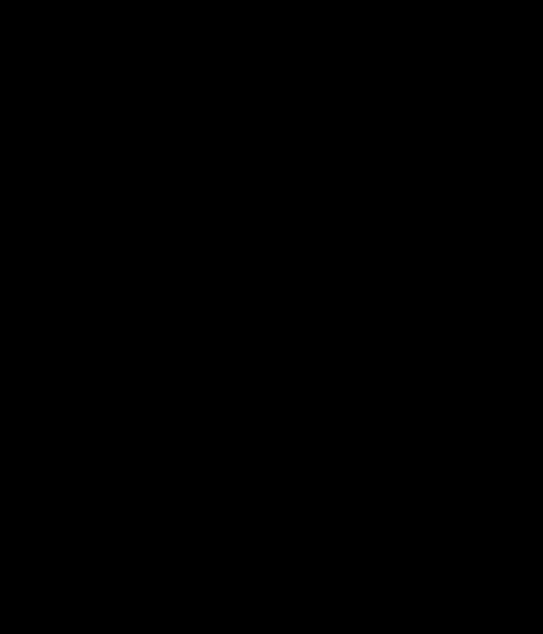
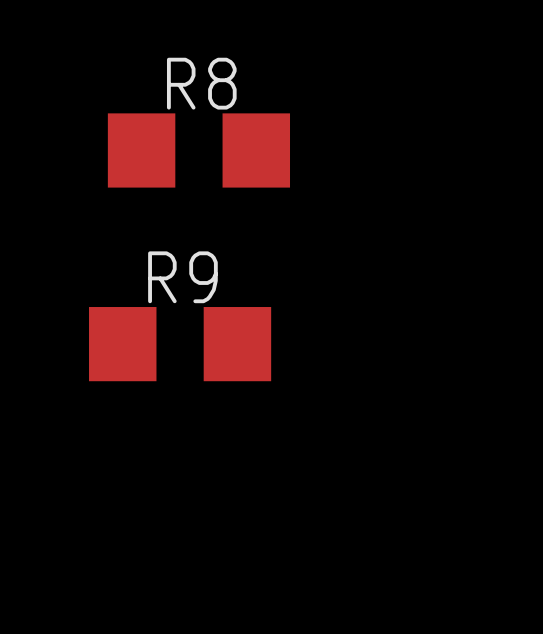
R8: none -> (198, 150)
R9: none -> (180, 344)

